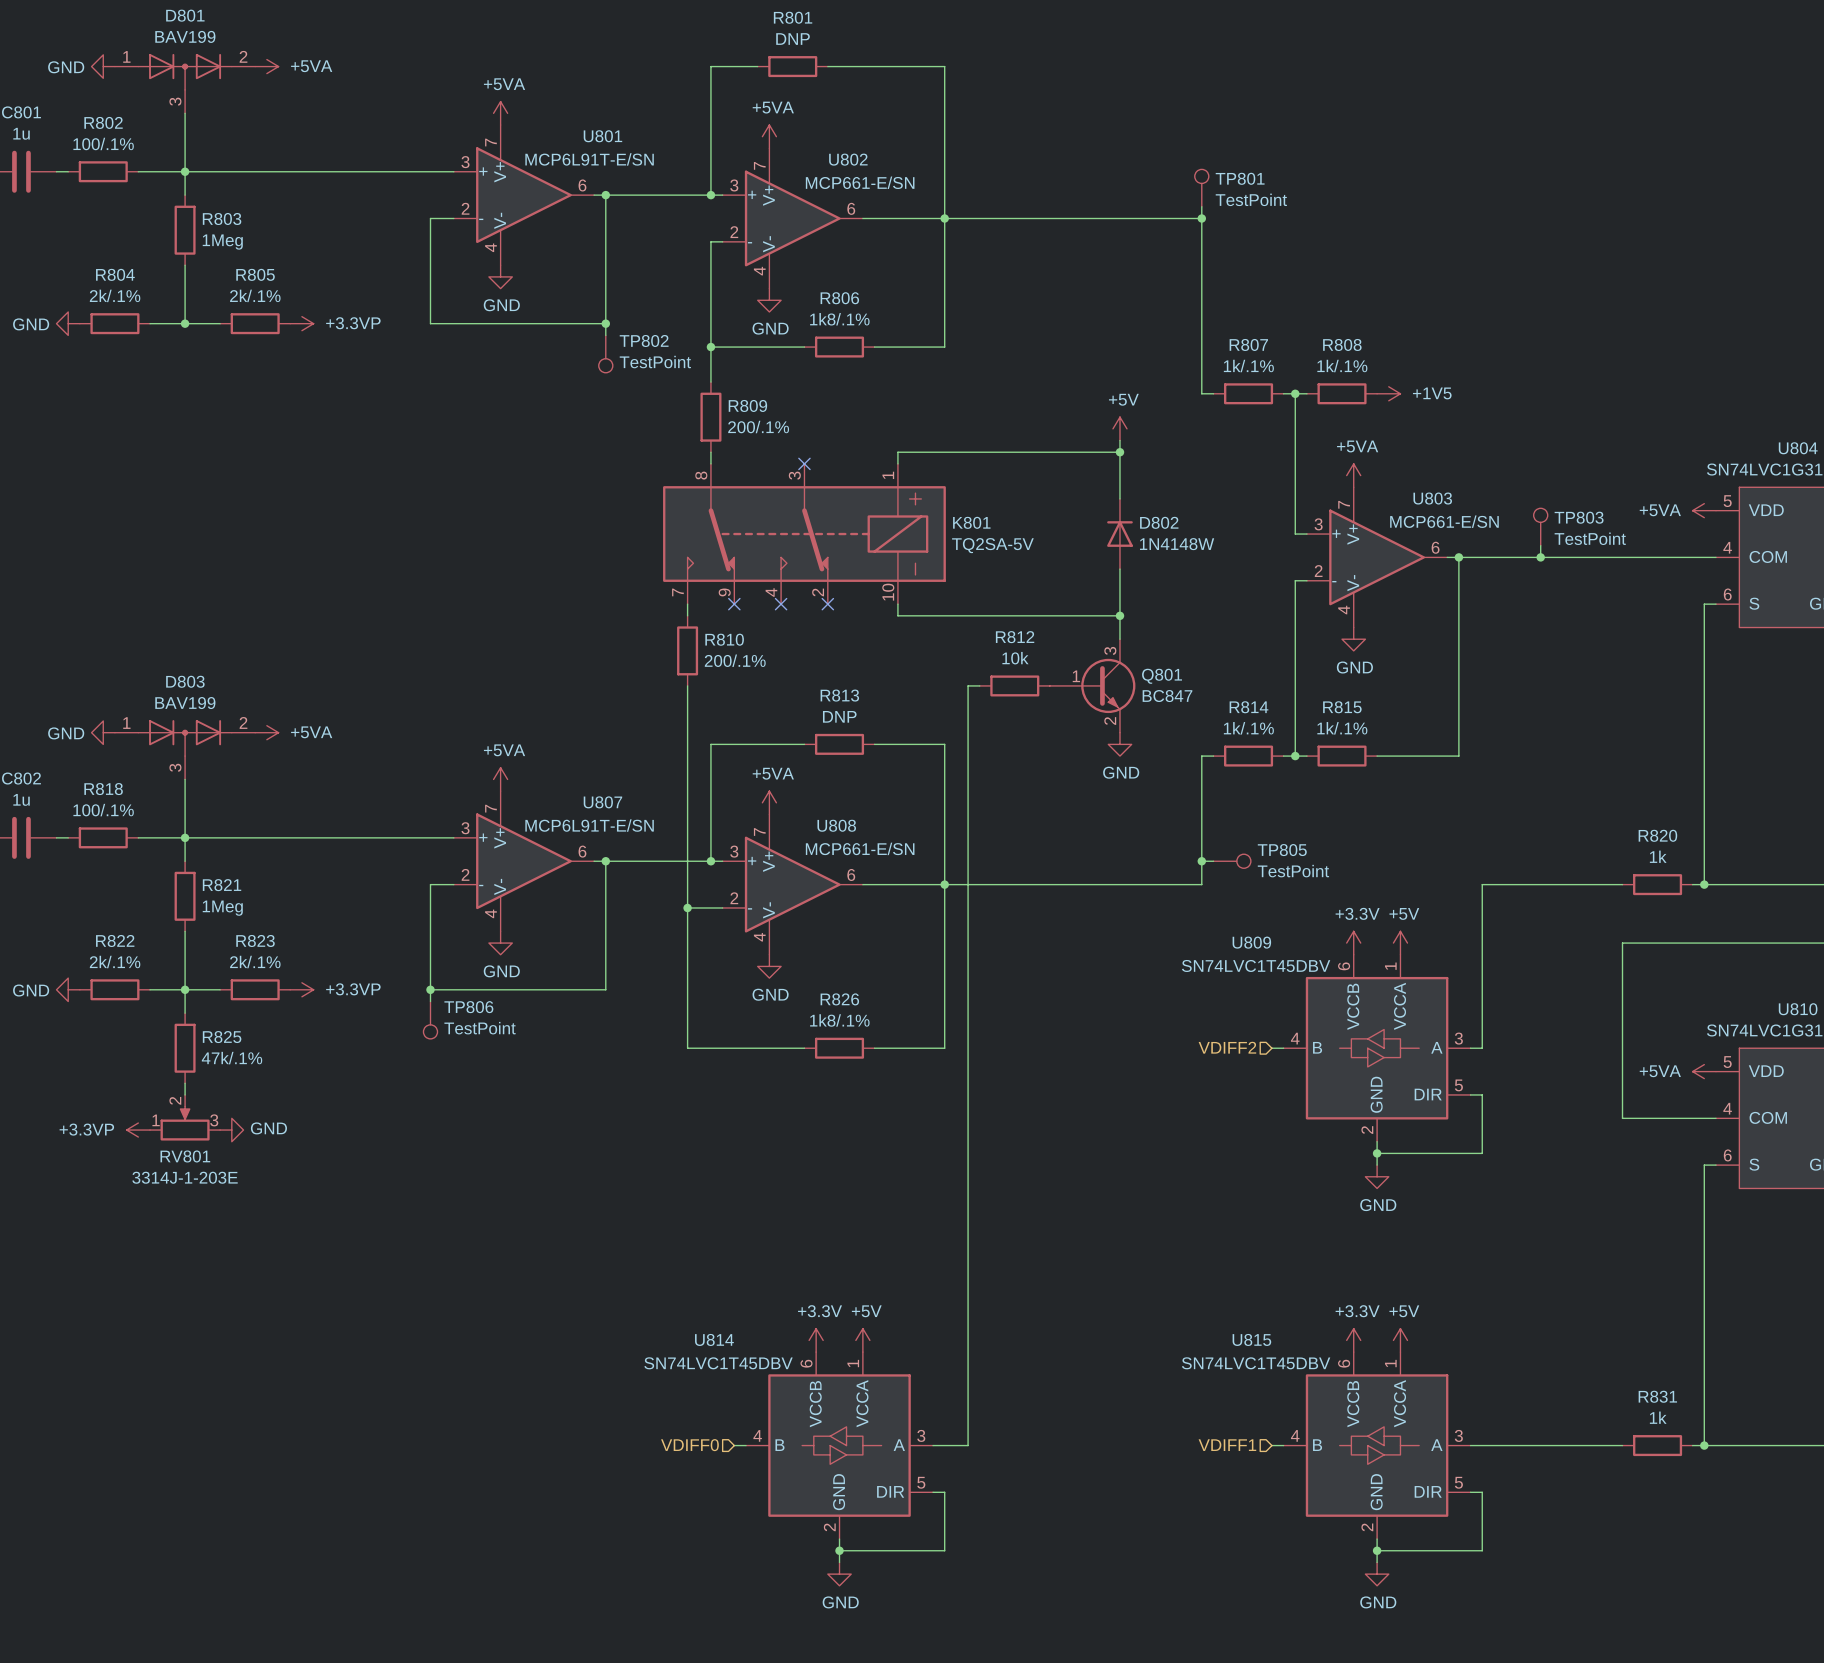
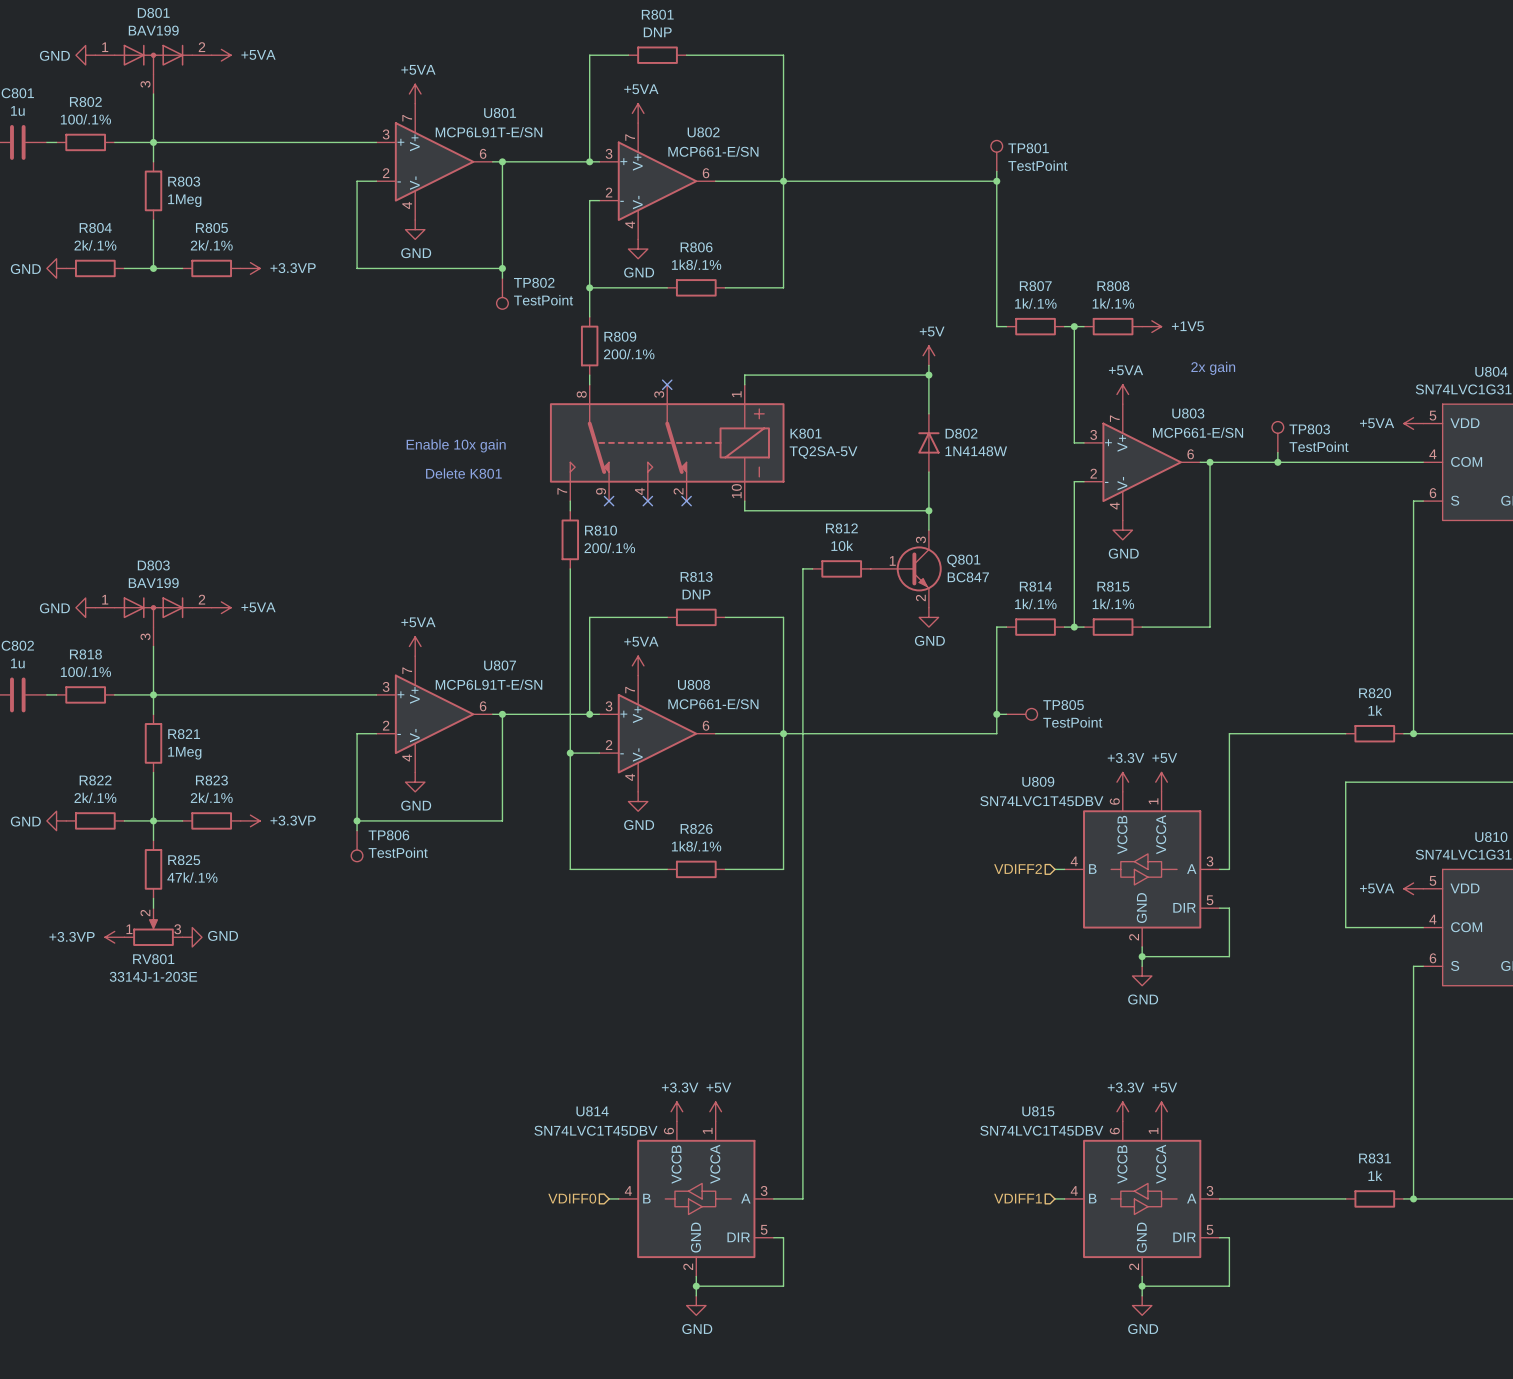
text: none -> 2x gain (1213, 368)
text: none -> Enable 10x gain (456, 445)
text: none -> Delete K801 (463, 473)

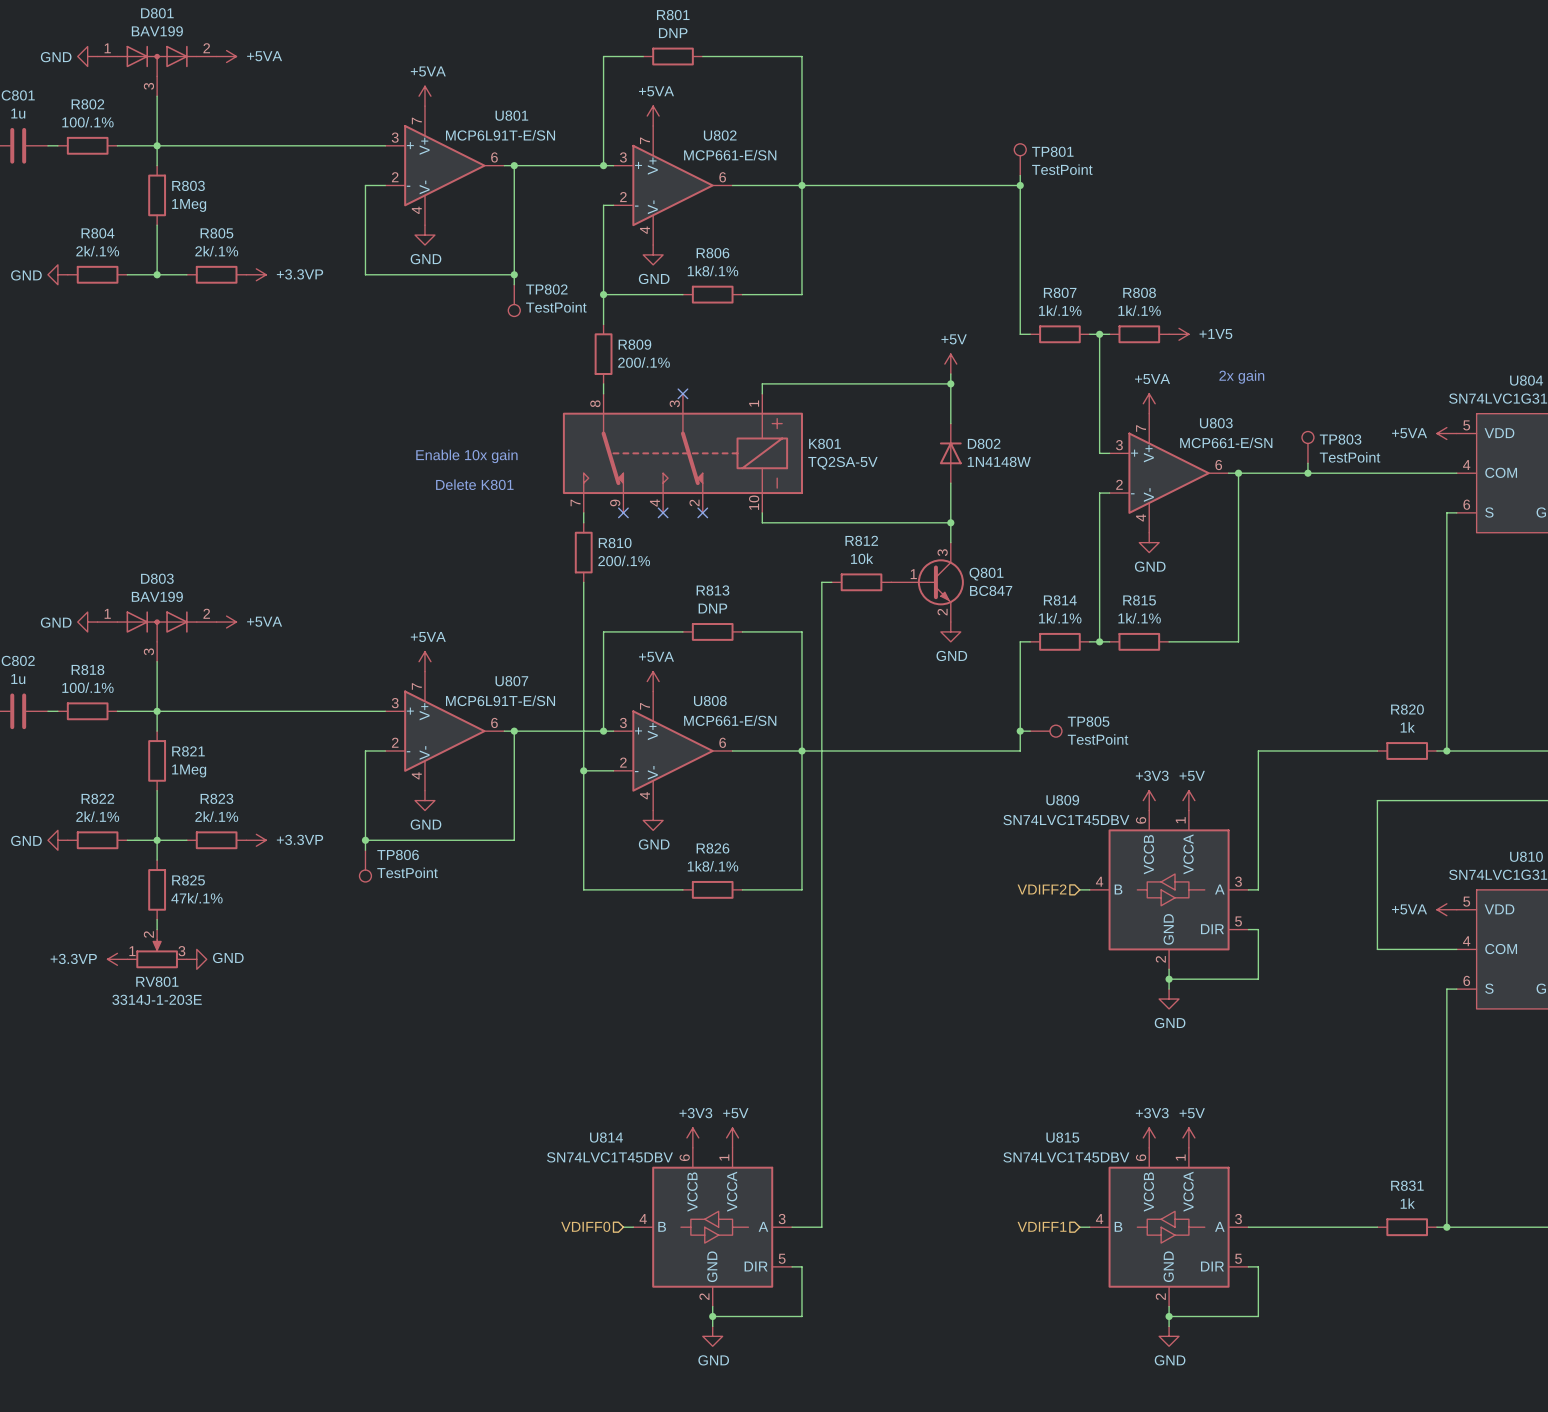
power symbol: +3.3V (1122, 782) -> +3V3 (1149, 800)
power symbol: +3.3V (676, 1111) -> +3V3 (692, 1137)
power symbol: +3.3V (1122, 1111) -> +3V3 (1149, 1137)

